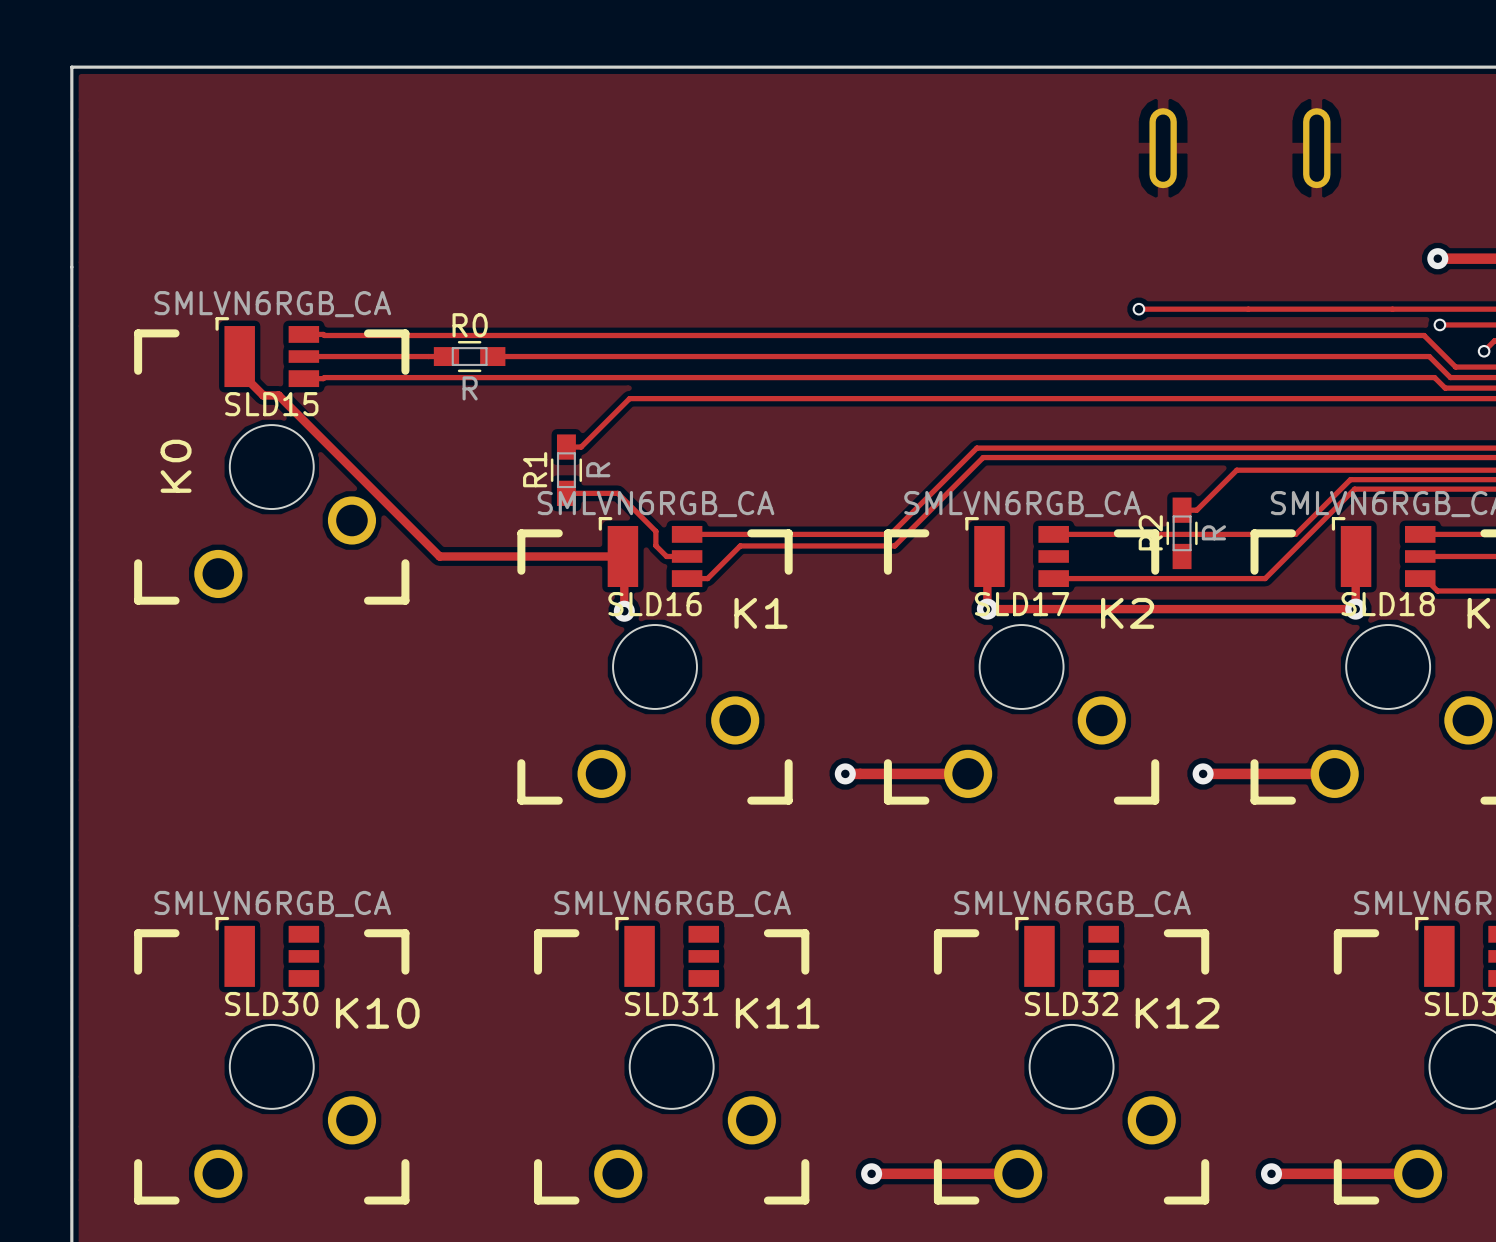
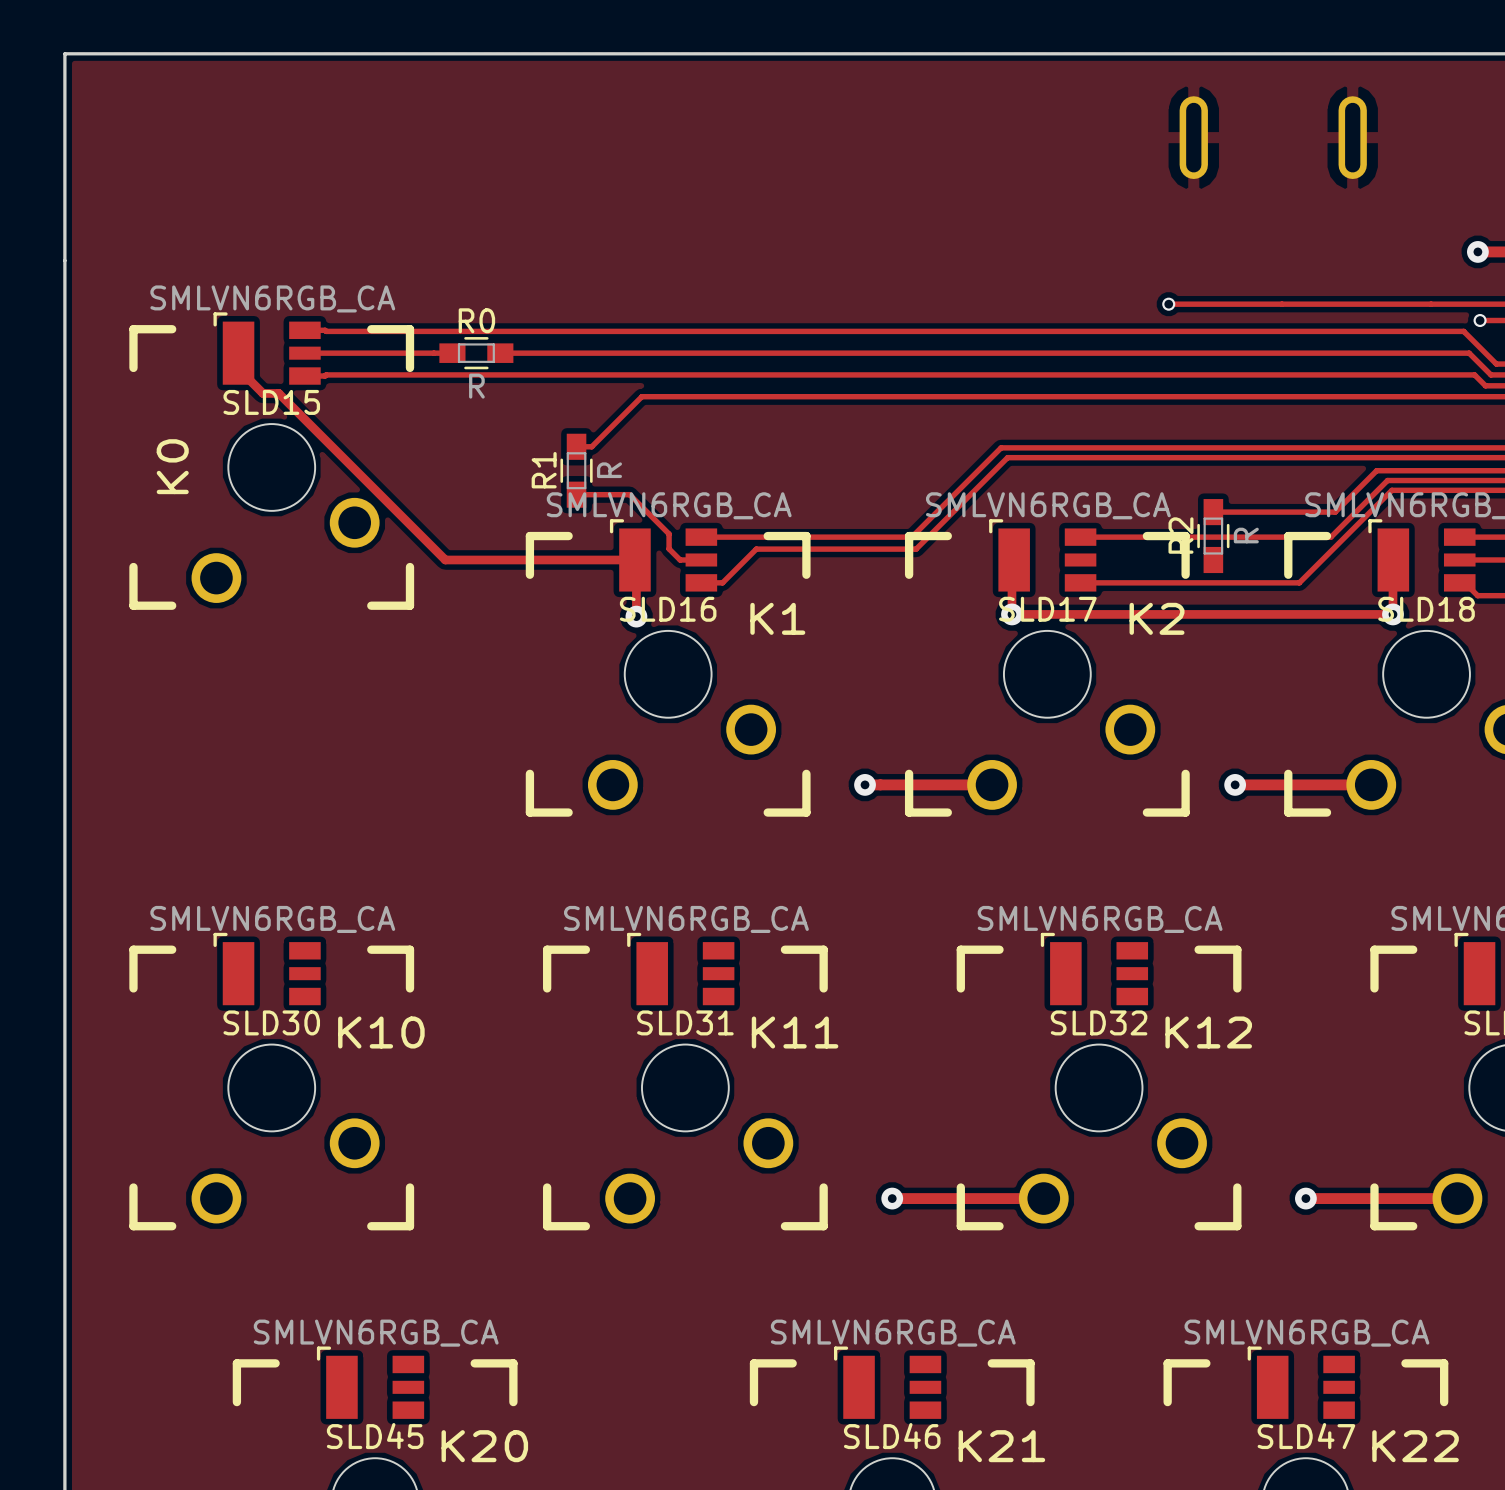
track: (1339, 470) (1236, 470) (1196, 510) -> (1376, 470) (1335, 512) (1228, 512)

